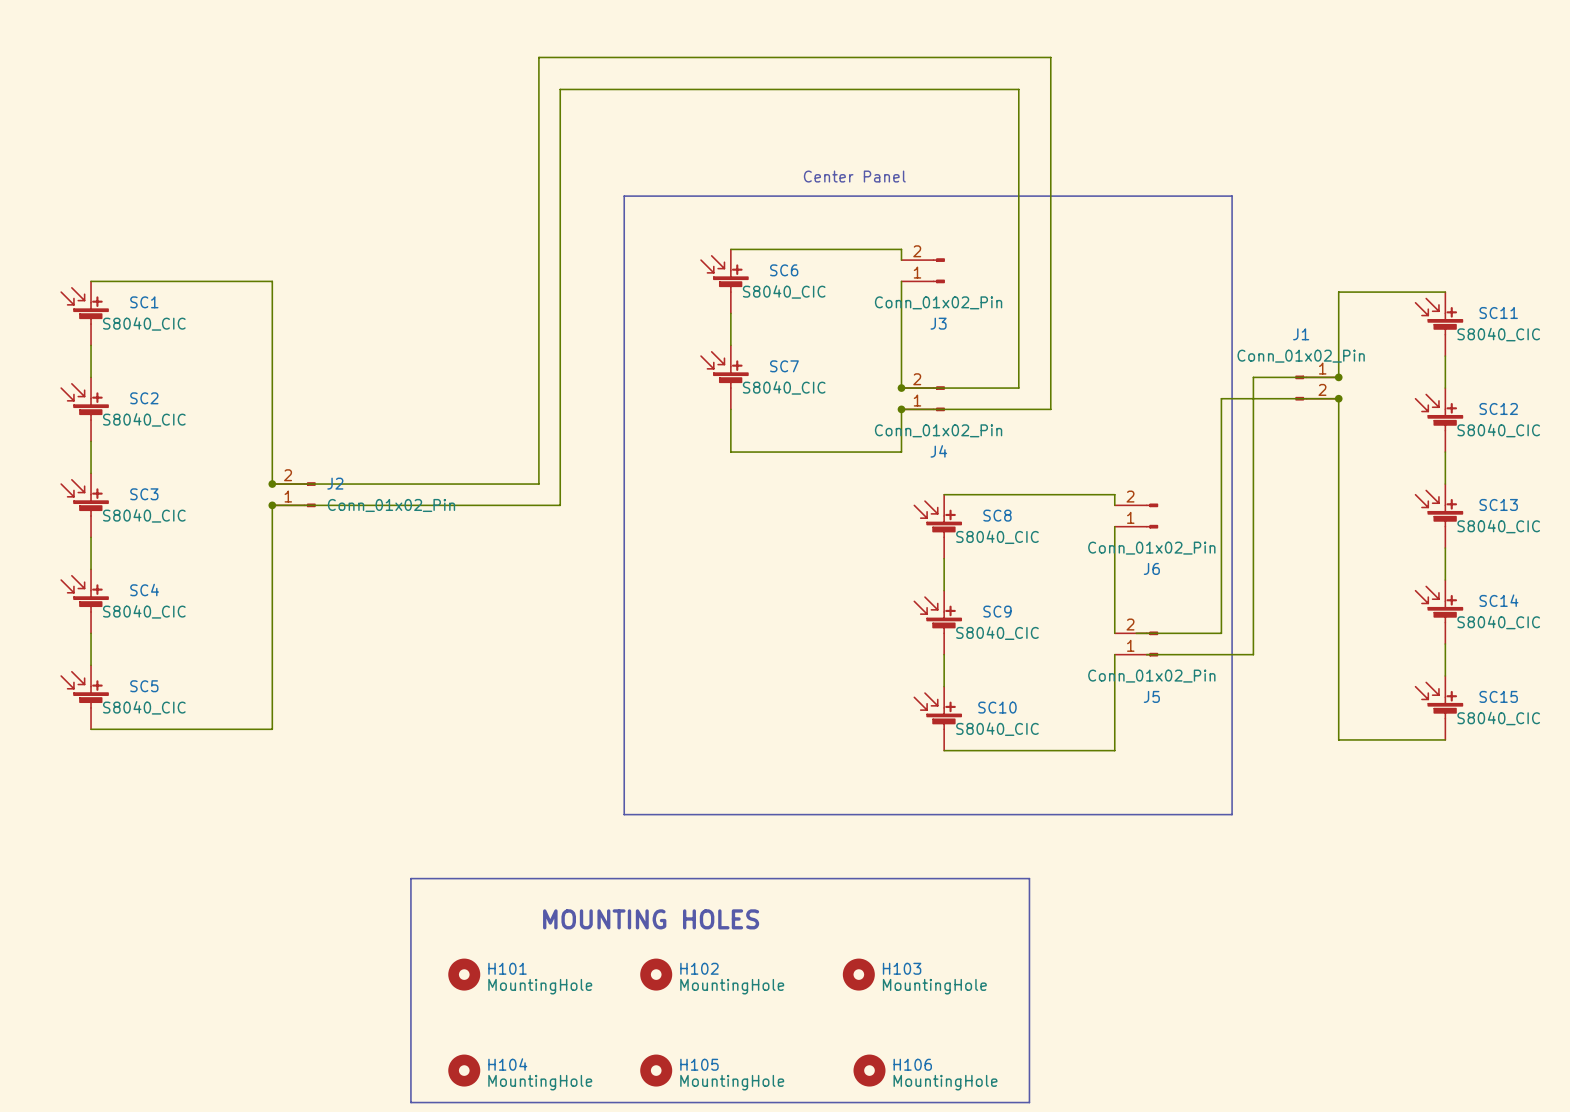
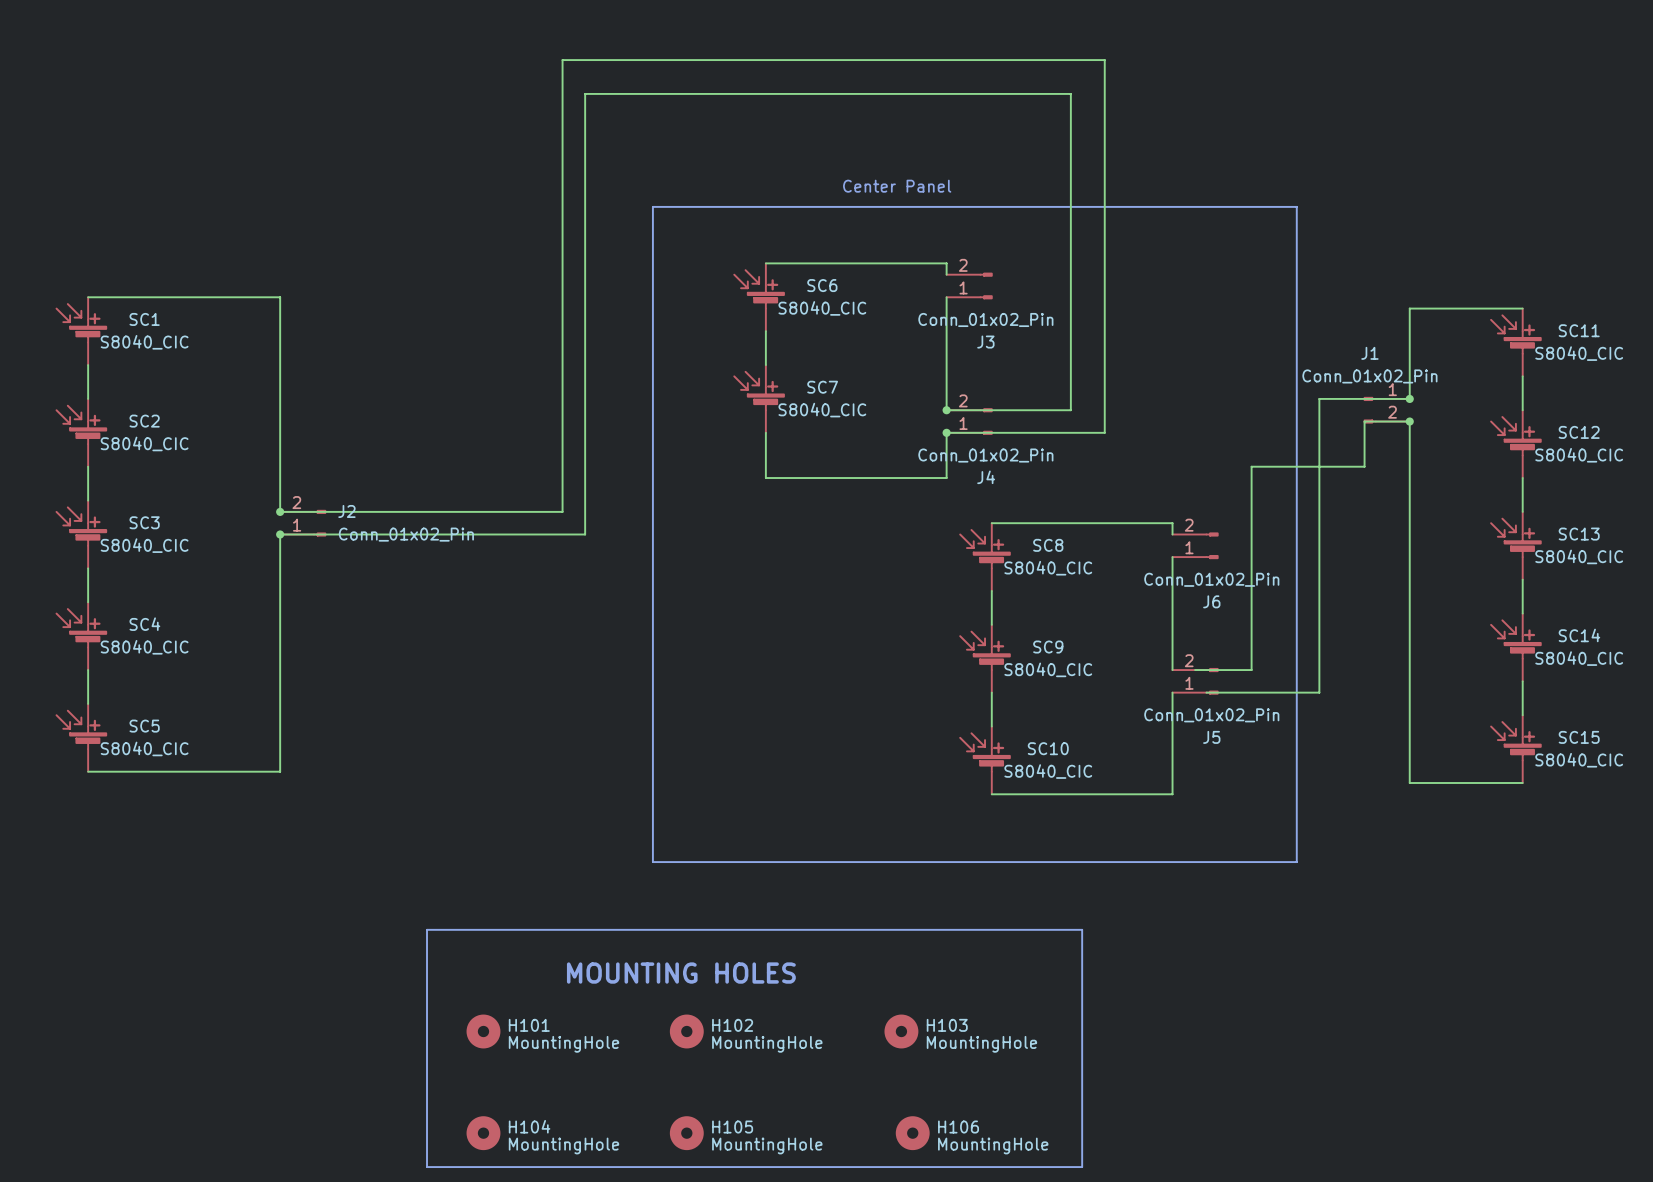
wire: (1296, 398) (1221, 398) (1221, 633) (1189, 633) -> (1364, 421) (1364, 466) (1251, 466) (1251, 670)

